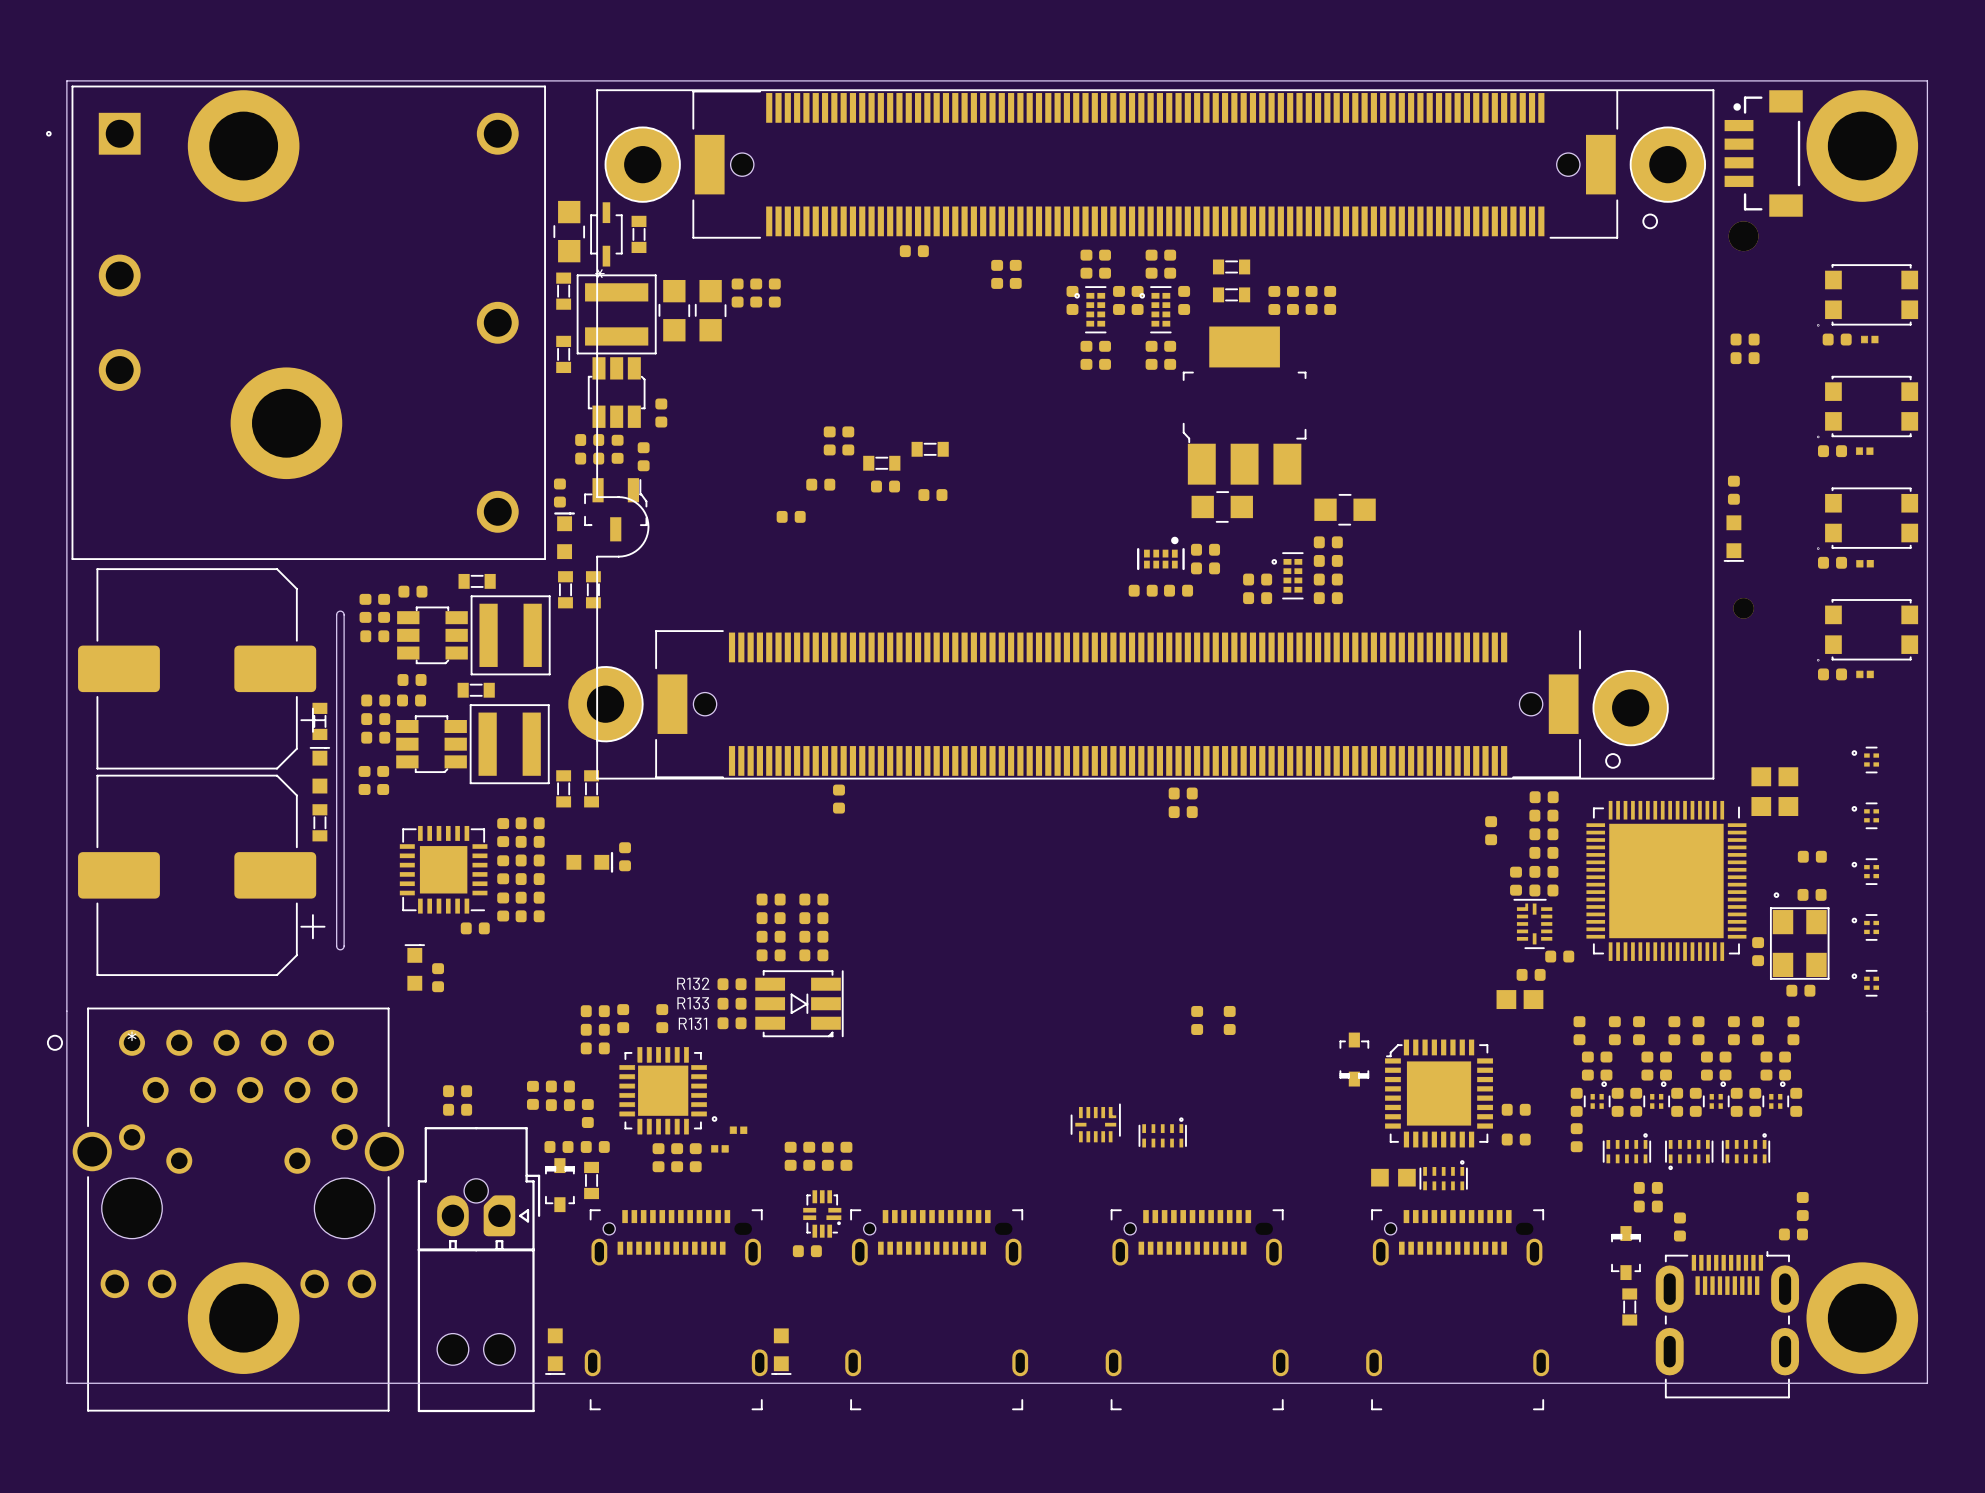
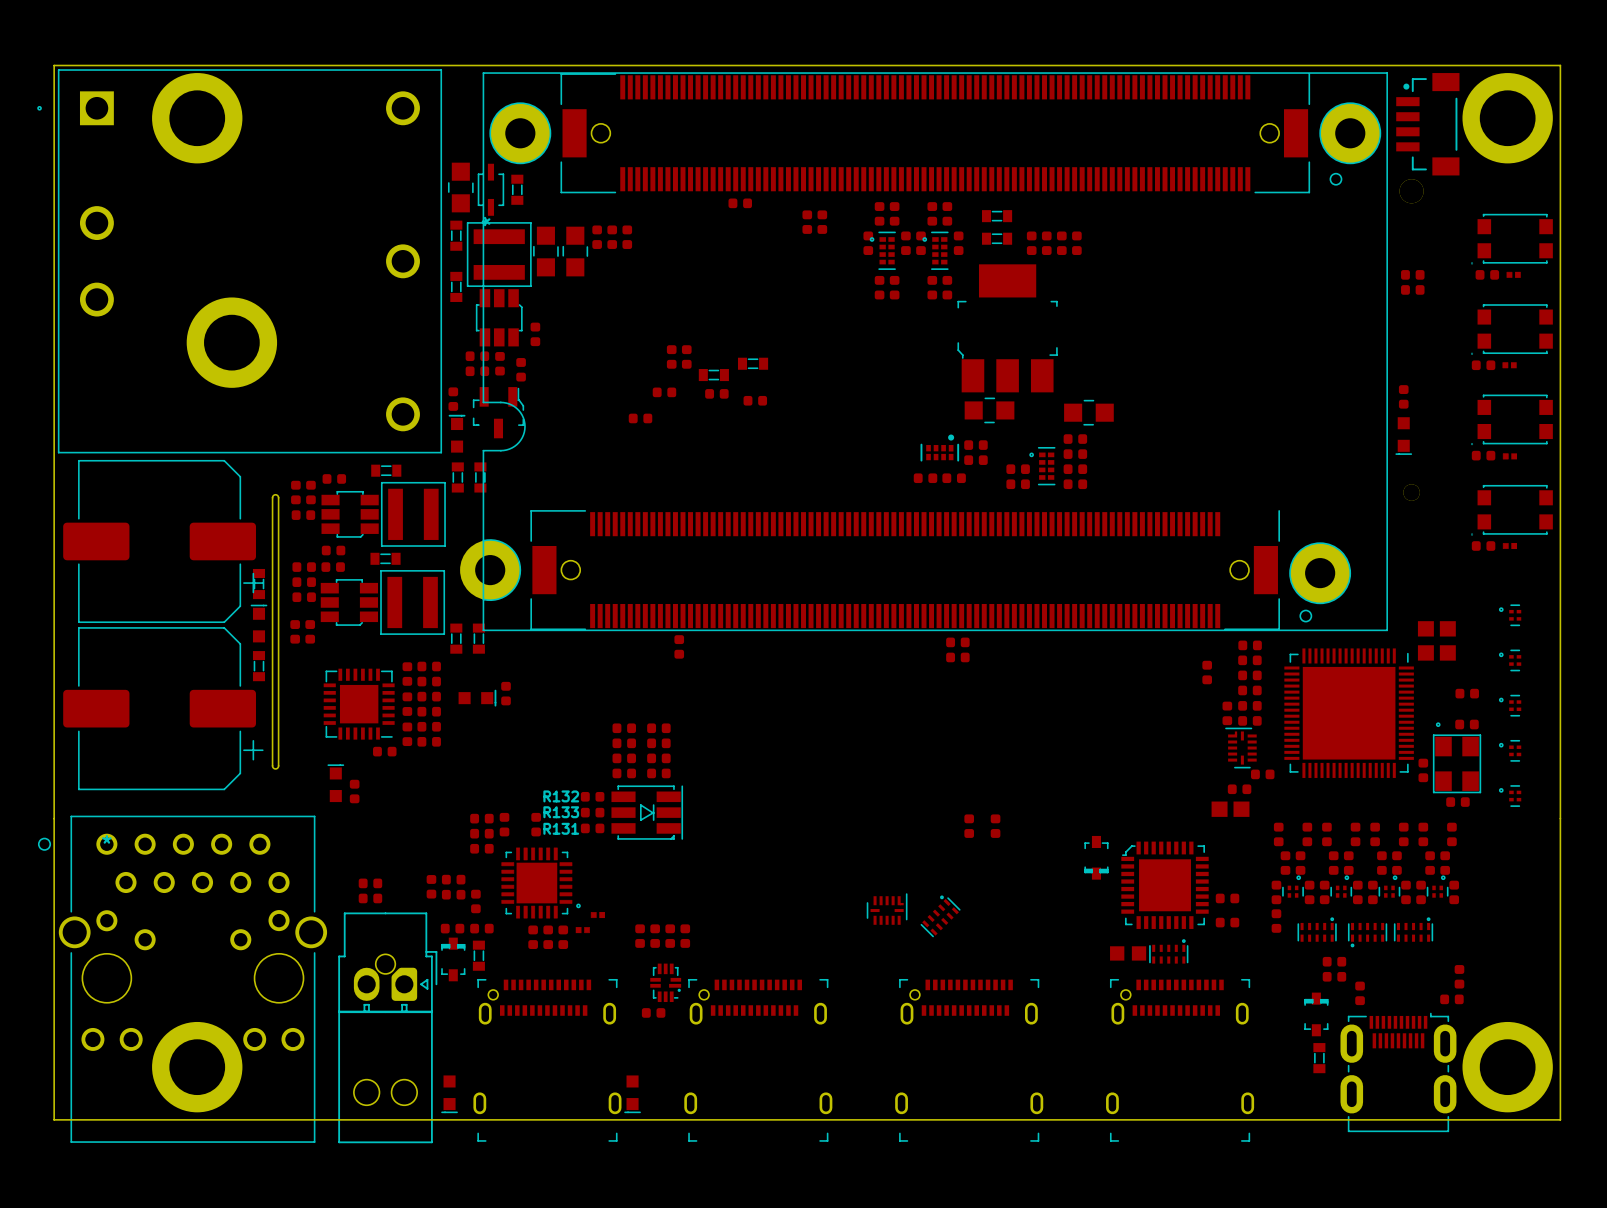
part rotation: 0° (1162, 1132) -> 45° counterclockwise (940, 916)

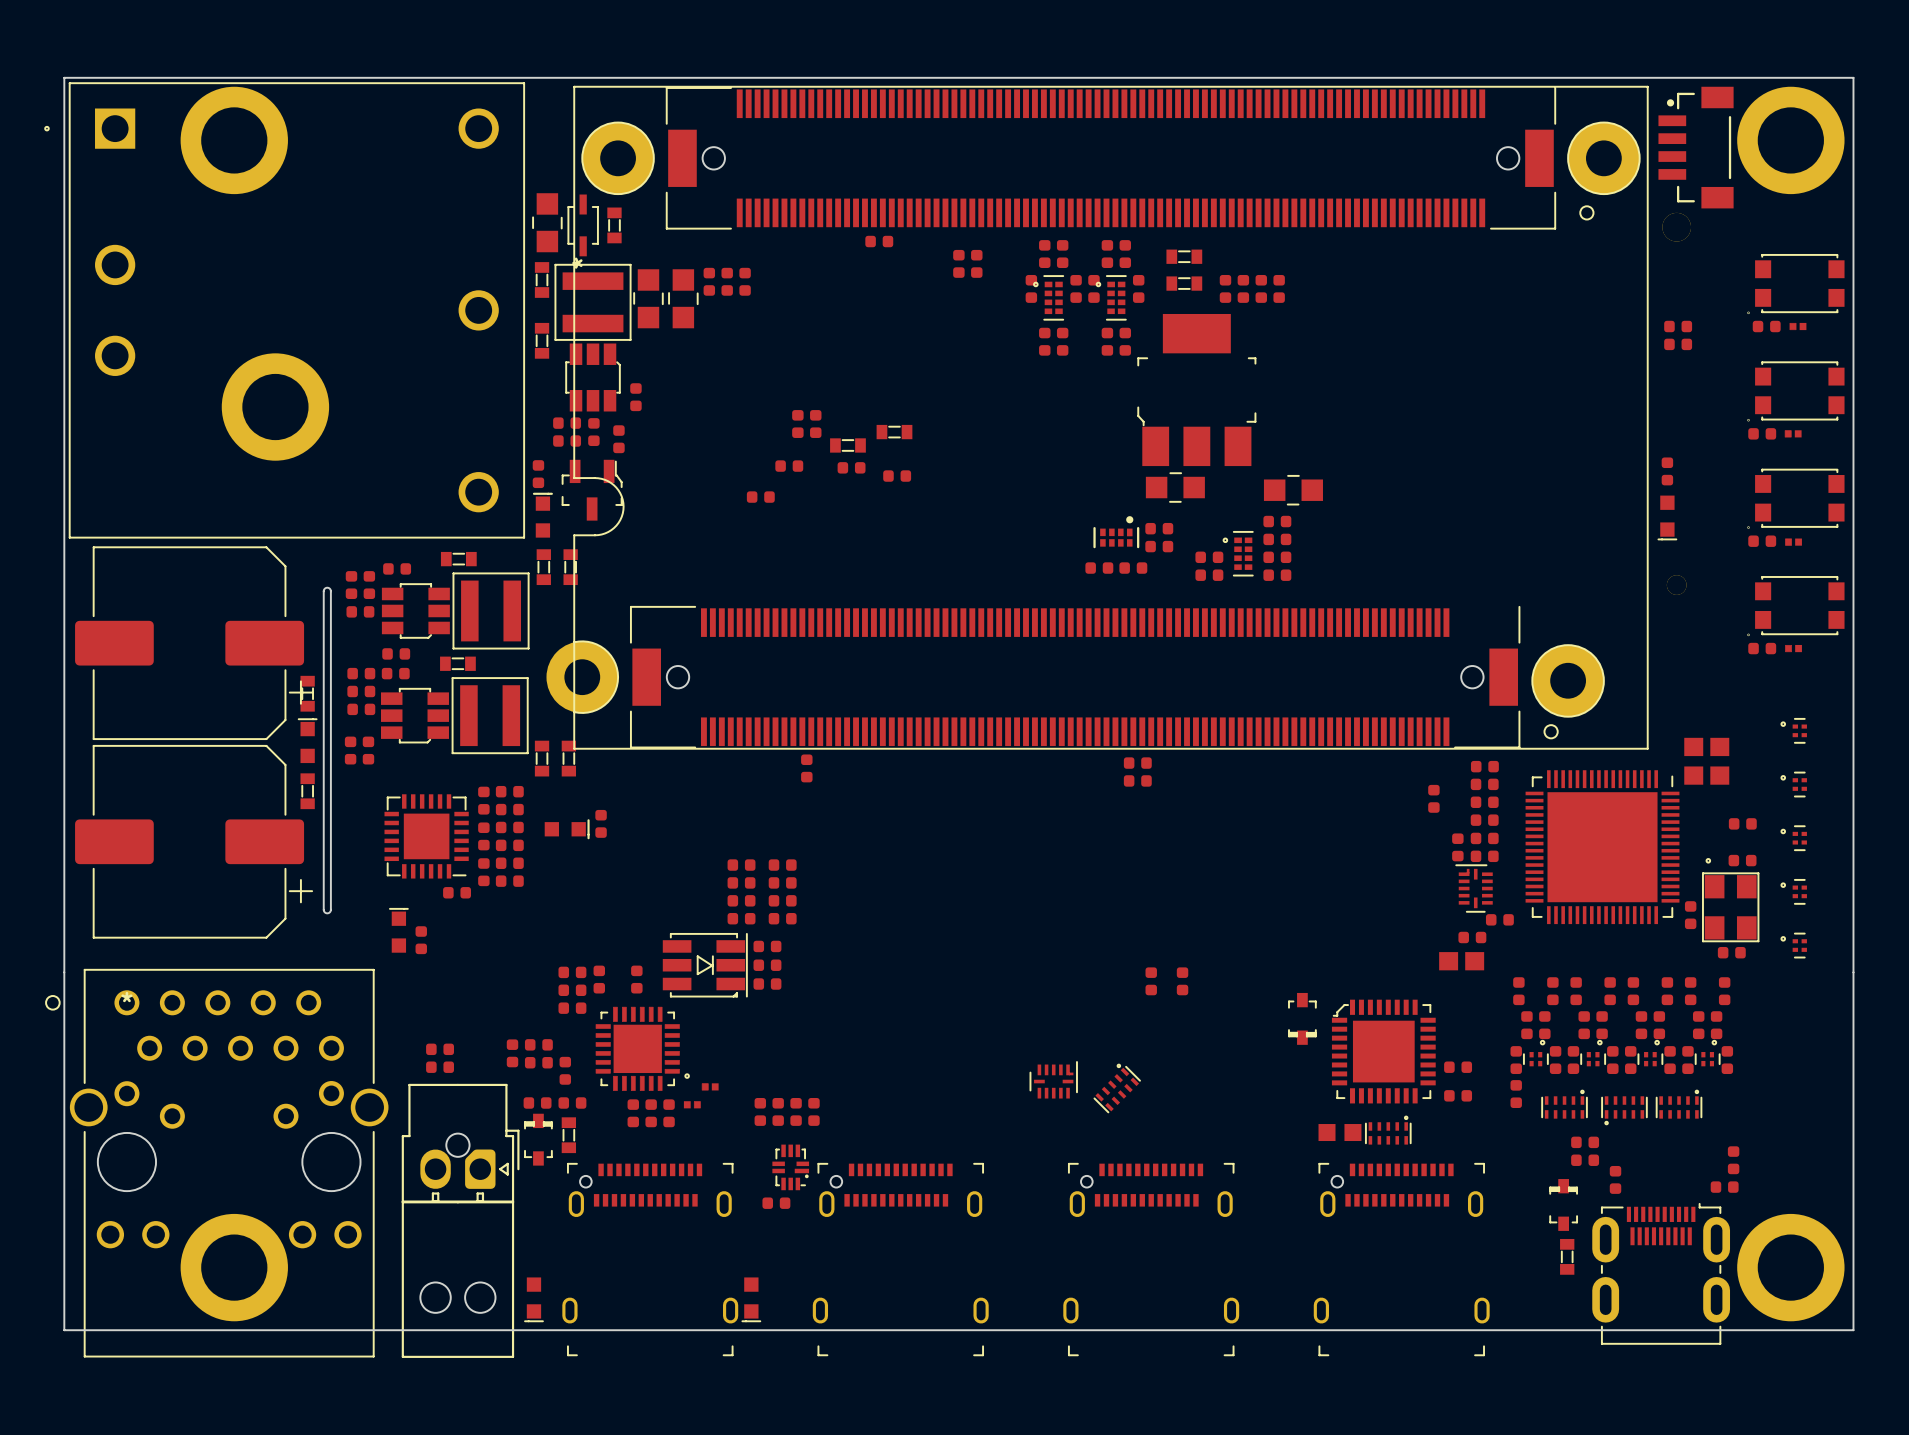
part footprint: [611, 785, 684, 840] -> [753, 959, 782, 971]
R132: (592, 796) -> none
part: none -> (767, 946)
R133: (592, 812) -> none
part: none -> (705, 965)
R131: (592, 828) -> none
part: none -> (767, 984)

